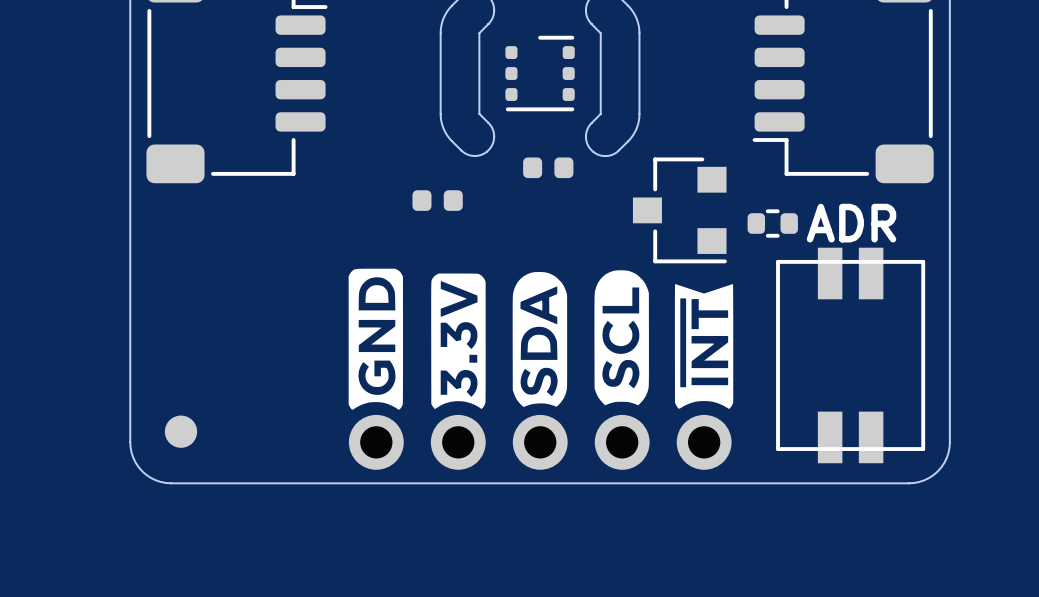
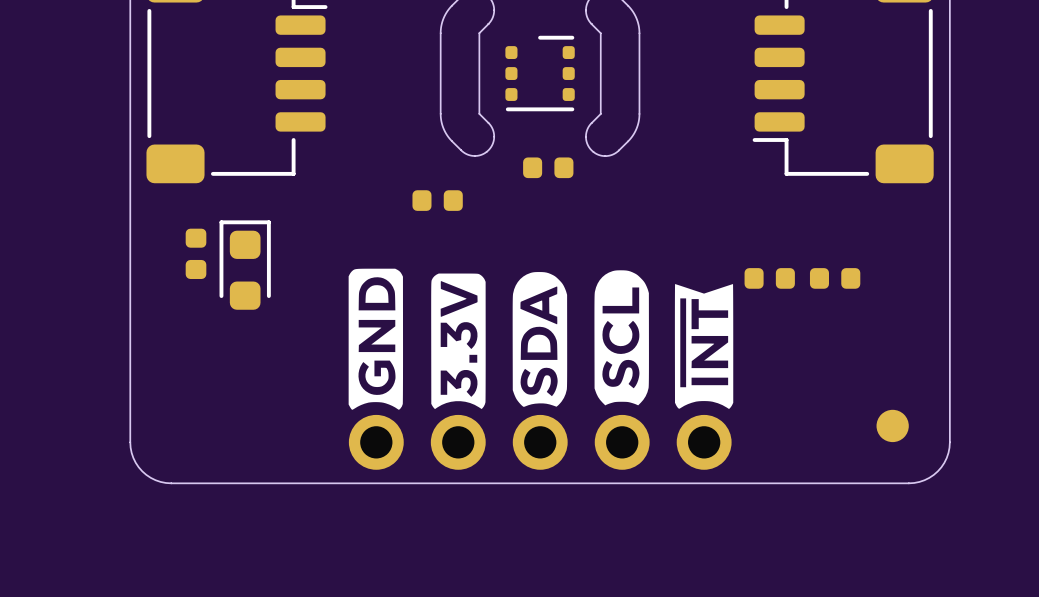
part: (679, 210) -> none
part: (772, 223) -> none
text: ADR (851, 223) -> none
part: none -> (196, 253)
part: none -> (245, 265)
part: none -> (769, 278)
part: none -> (835, 278)
part: (850, 355) -> none
part position: (181, 431) -> (892, 425)

